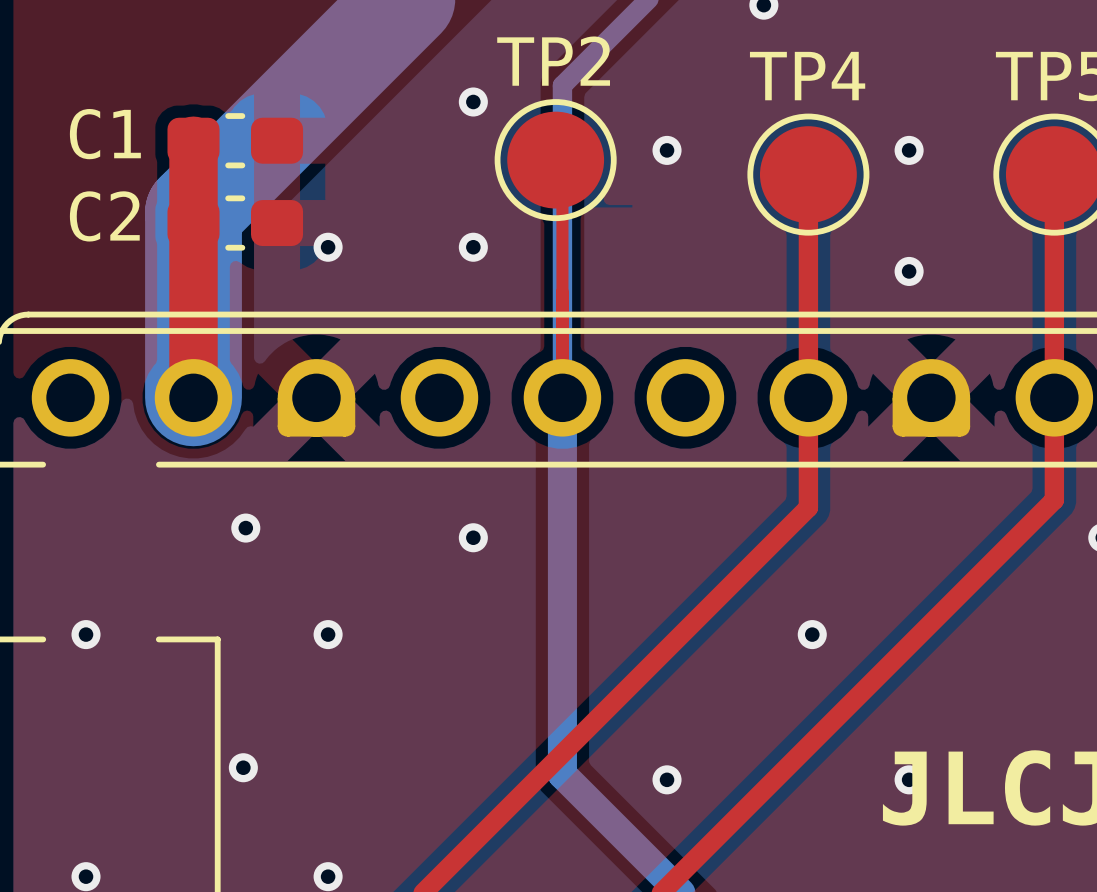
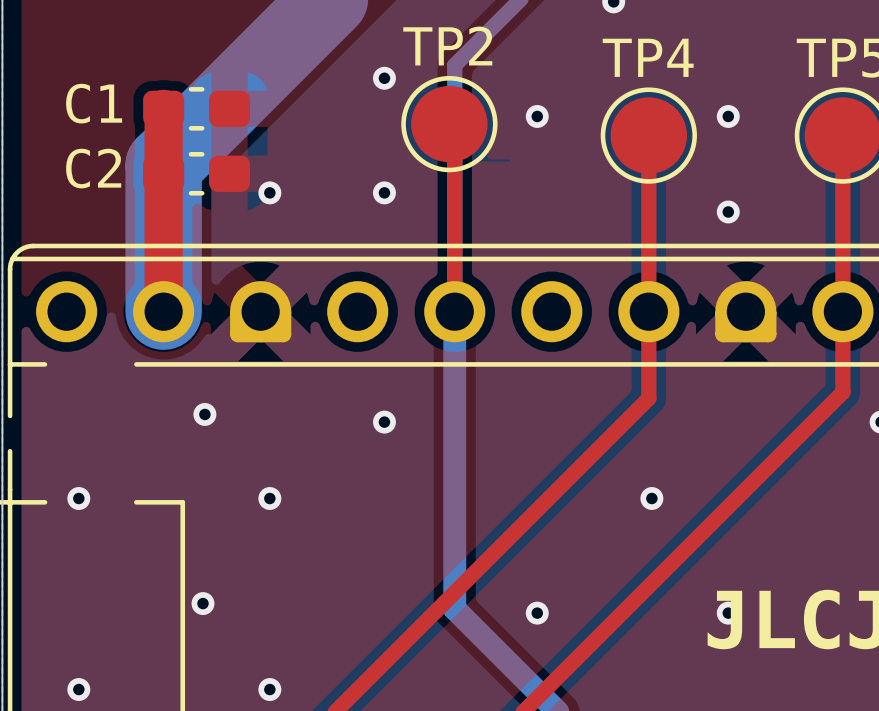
top track width: thin (555, 160) (562, 166) (562, 397) -> thick (449, 124) (454, 129) (454, 311)

